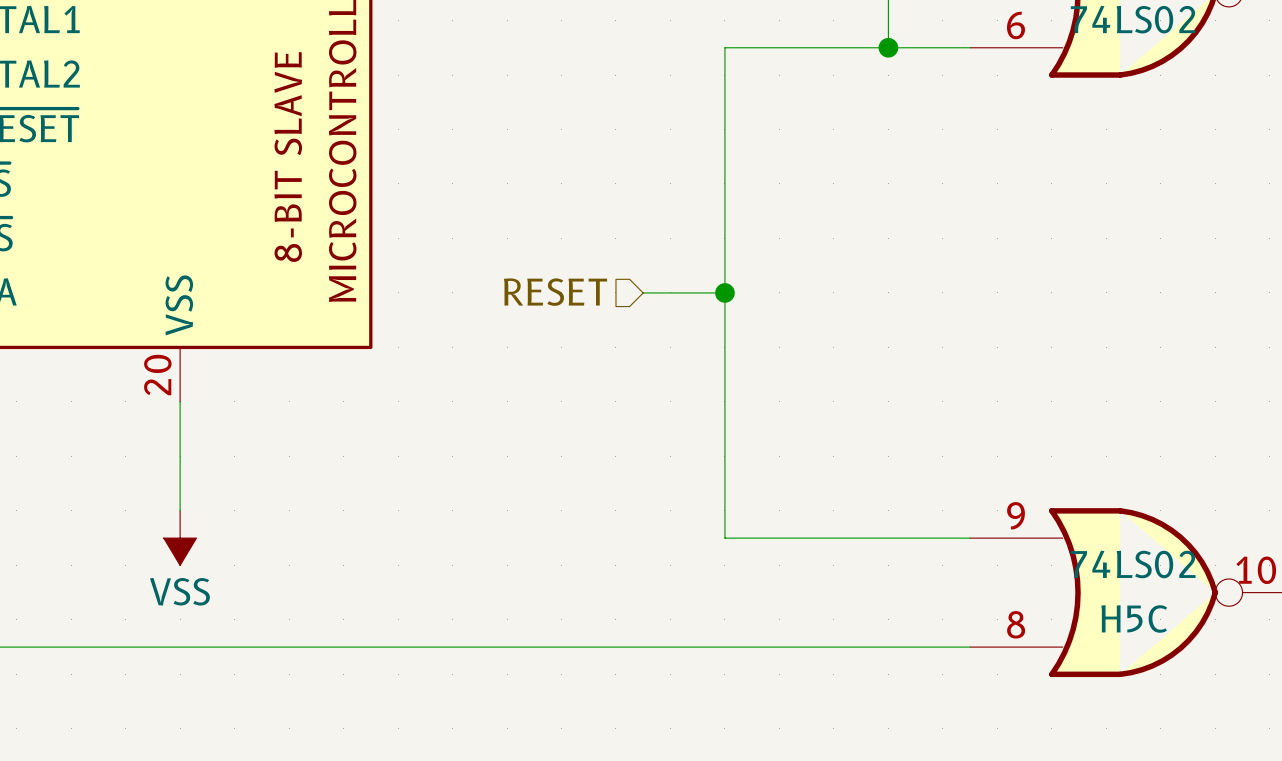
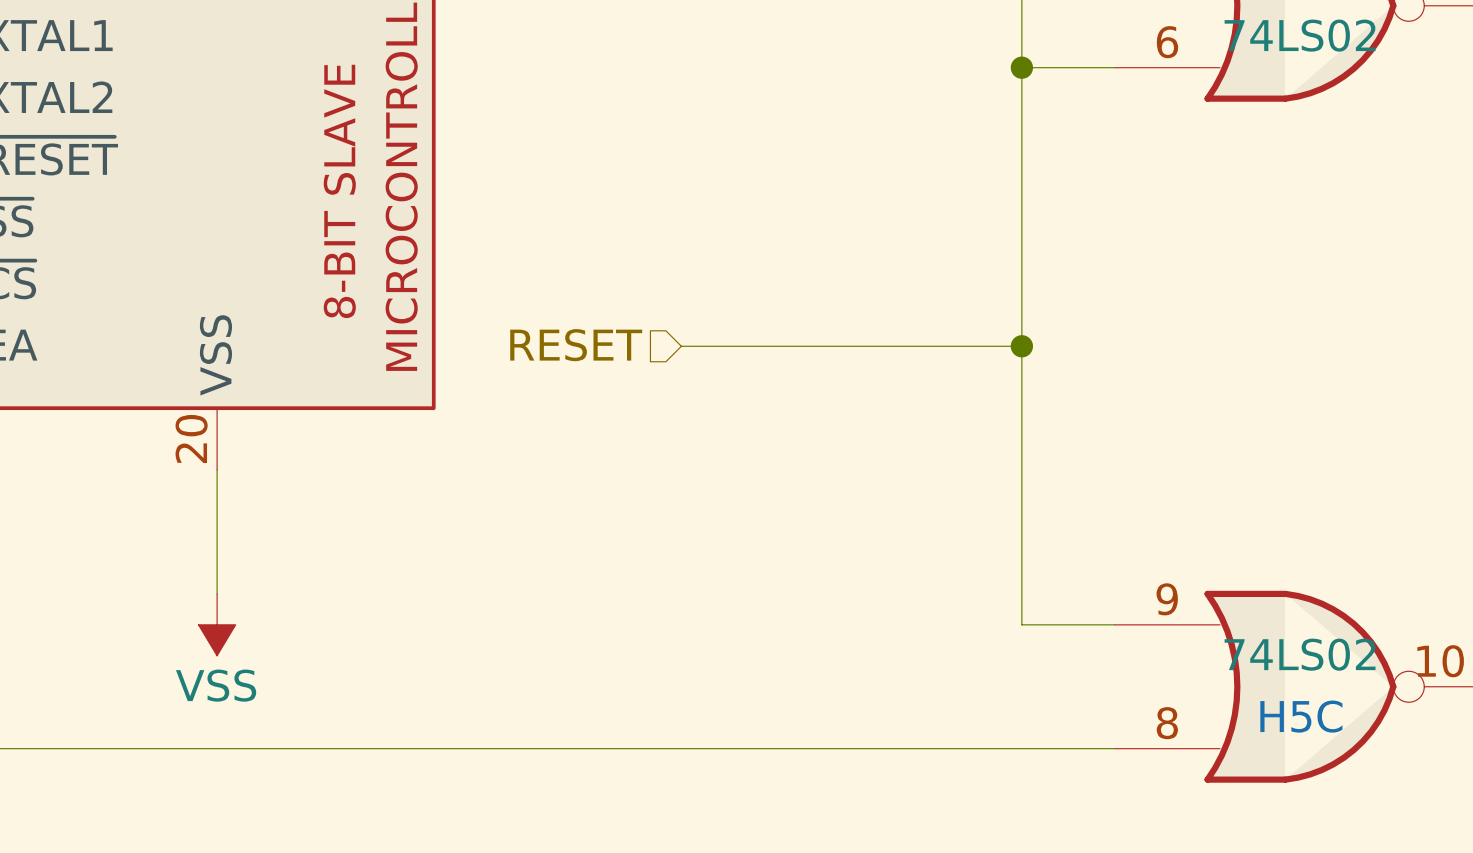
wire: (888, 47) (724, 47) (724, 538) (888, 538) -> (1021, 67) (1021, 624)
hierarchical label position: RESET (555, 292) -> RESET (576, 345)
wire: none -> (681, 346) (743, 346)
wire: none -> (836, 346) (1021, 346)
junction: (724, 292) -> none
junction: none -> (1021, 346)

